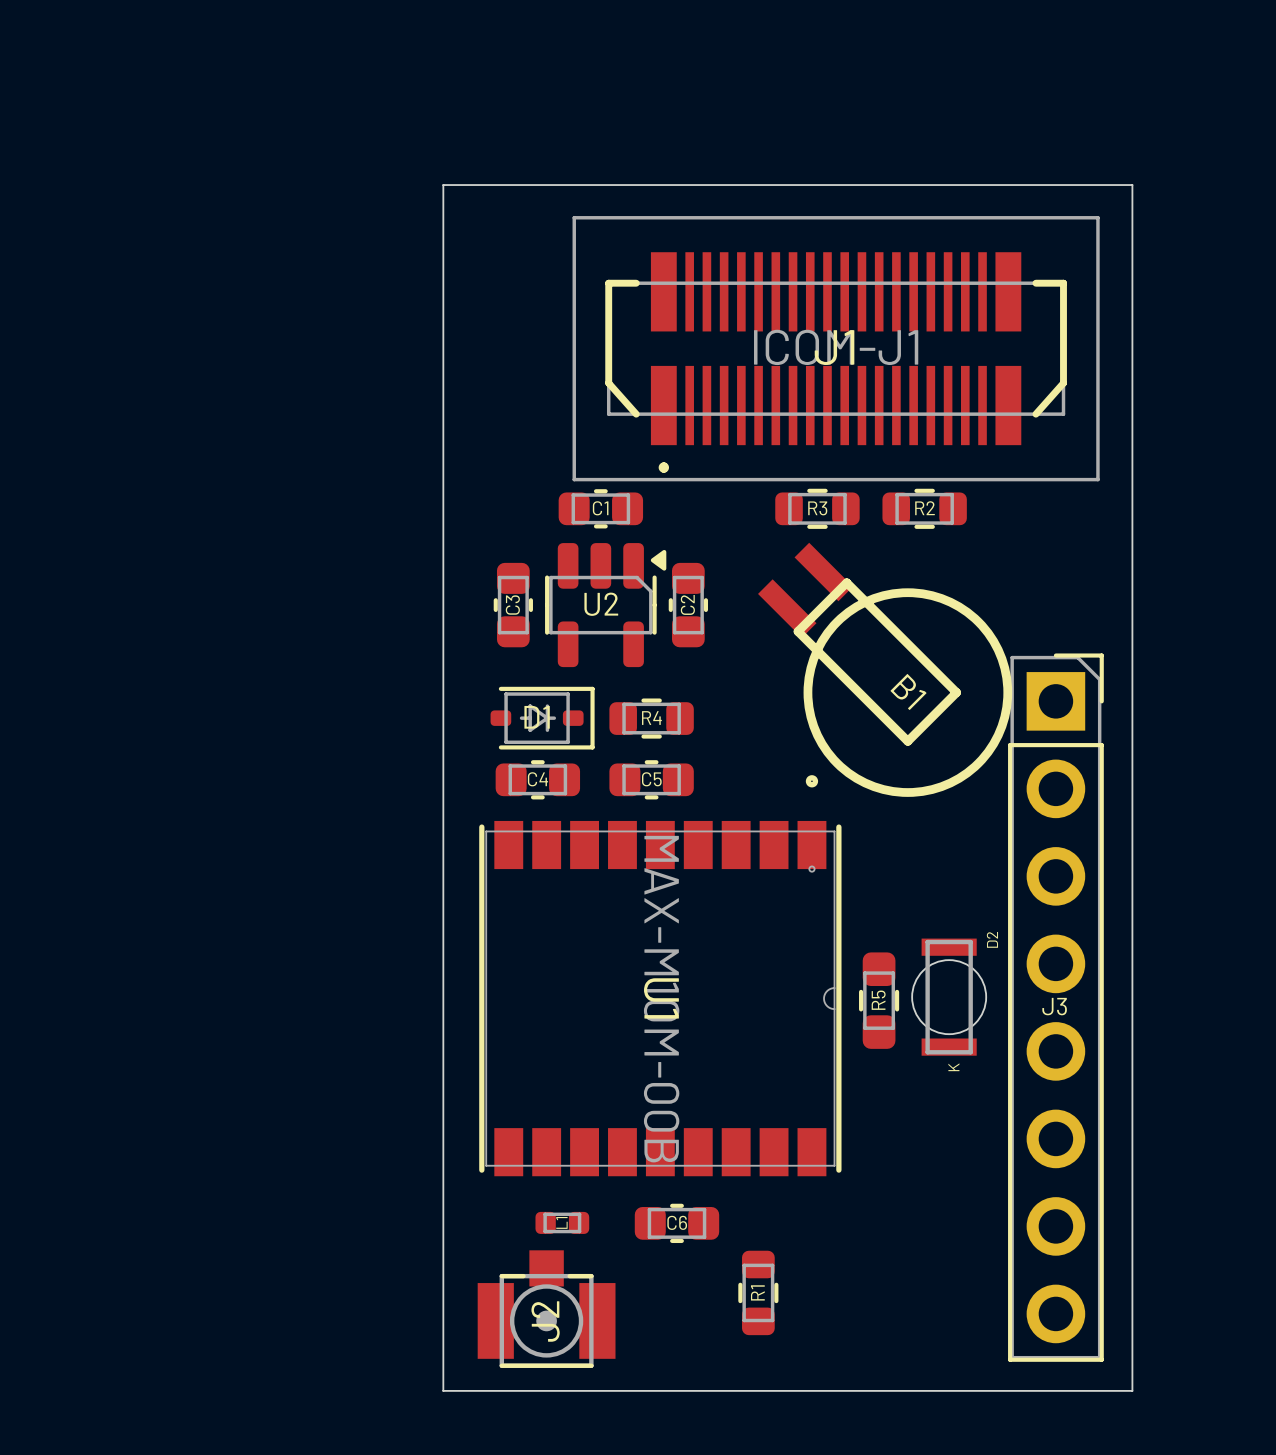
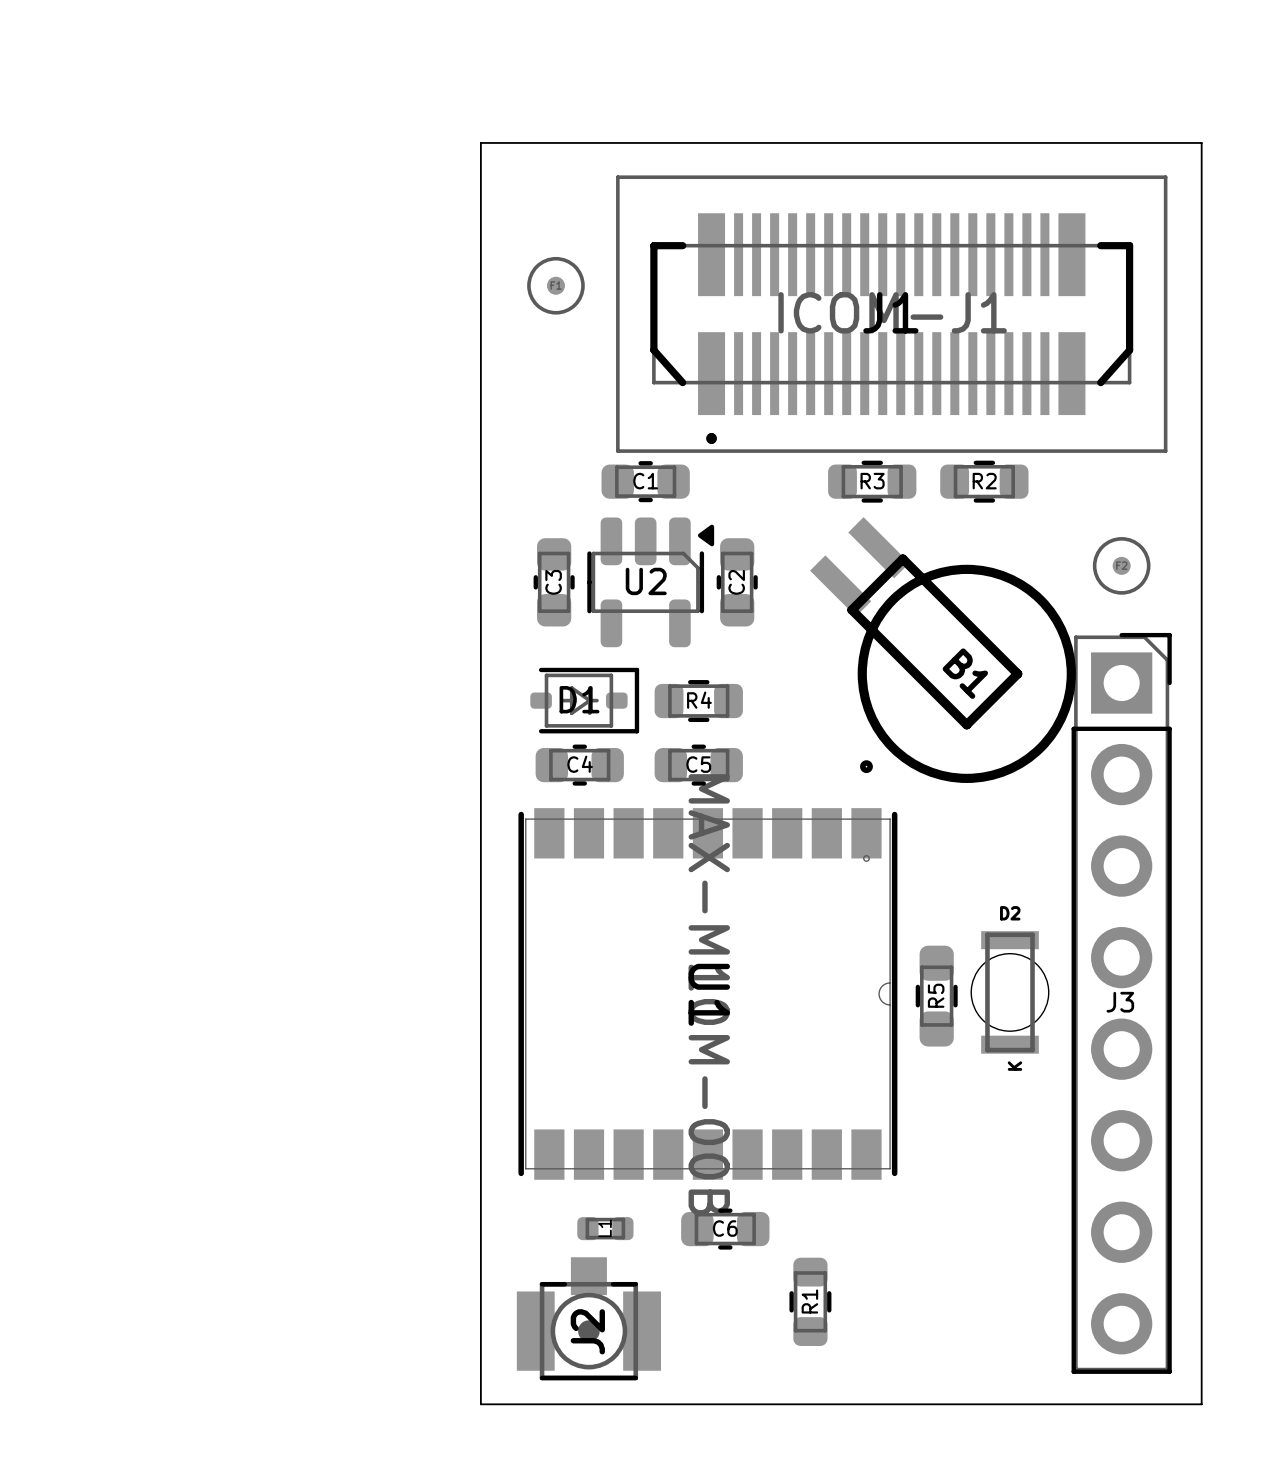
part: none -> (555, 285)
part: none -> (1121, 565)
D2 name rotation: 0° (992, 939) -> 90° clockwise (1010, 913)
D2 name position: D2 (992, 939) -> D2 (1010, 913)

